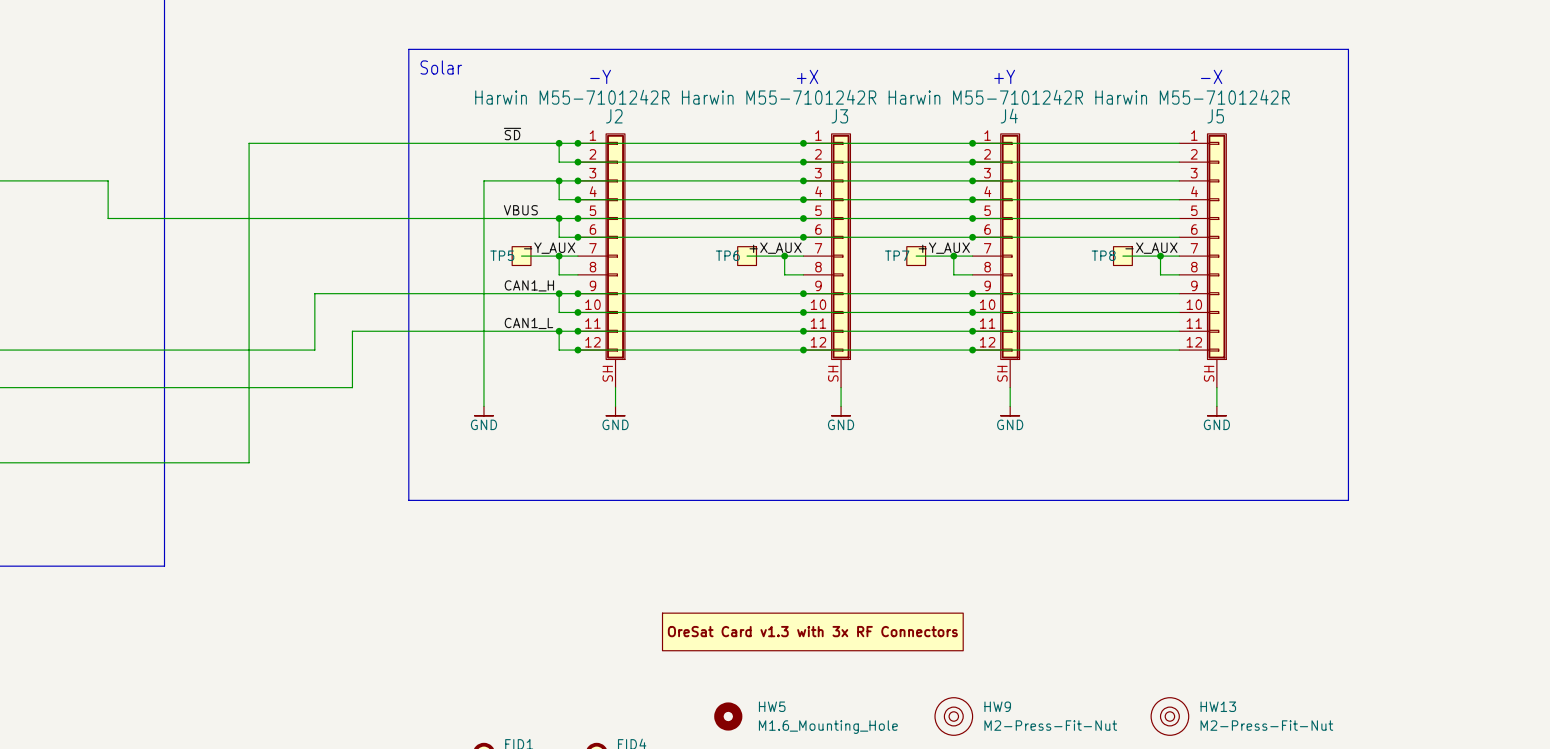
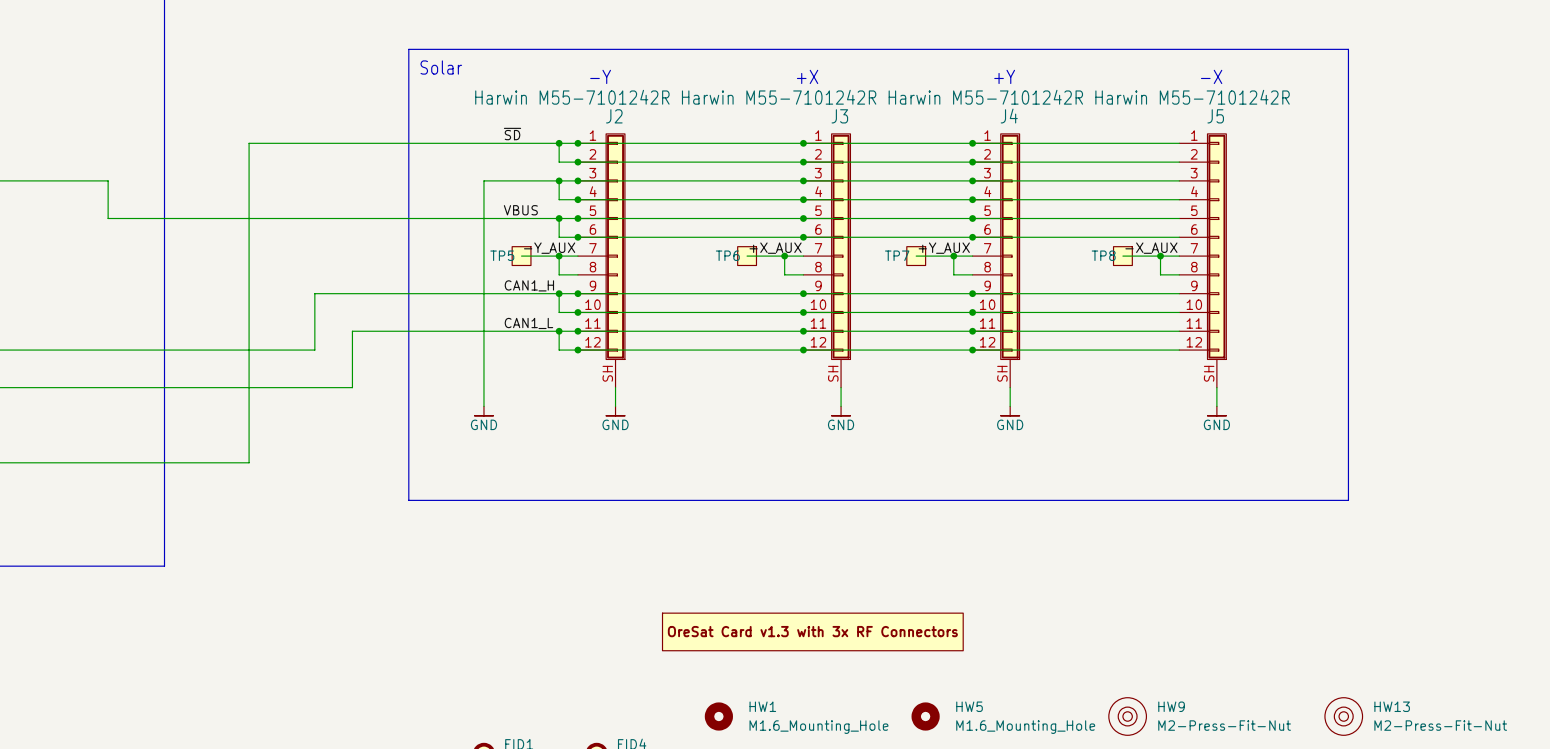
HW1: none -> M1.6_Mounting_Hole (718, 716)
HW5 position: (728, 716) -> (925, 716)
HW9 position: (953, 716) -> (1127, 716)
HW13 position: (1169, 716) -> (1343, 716)

